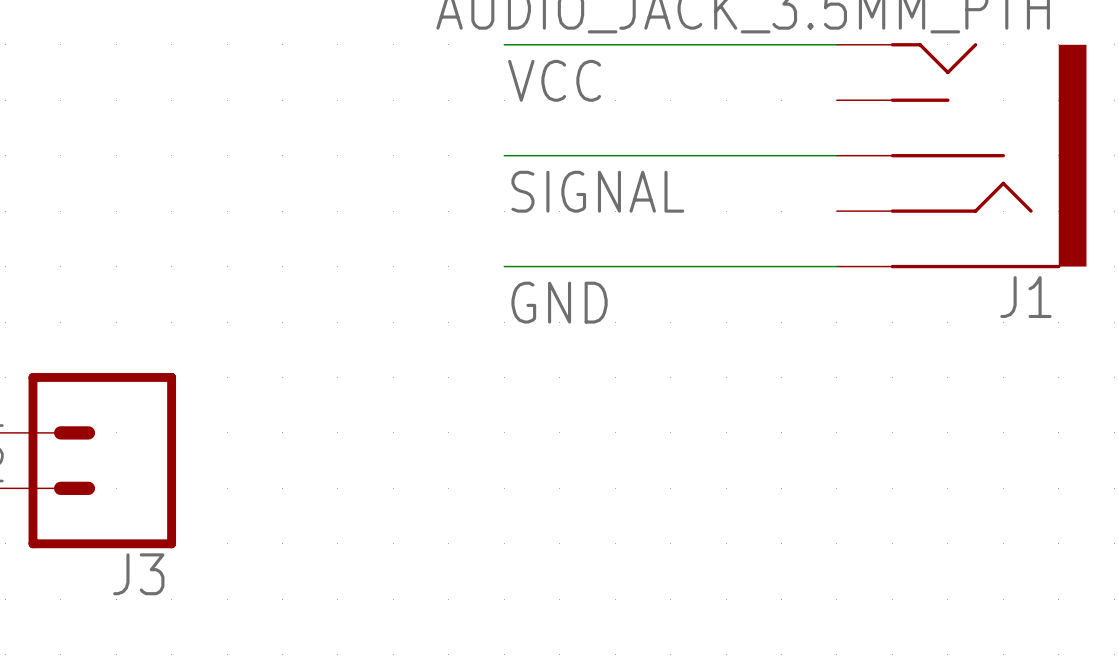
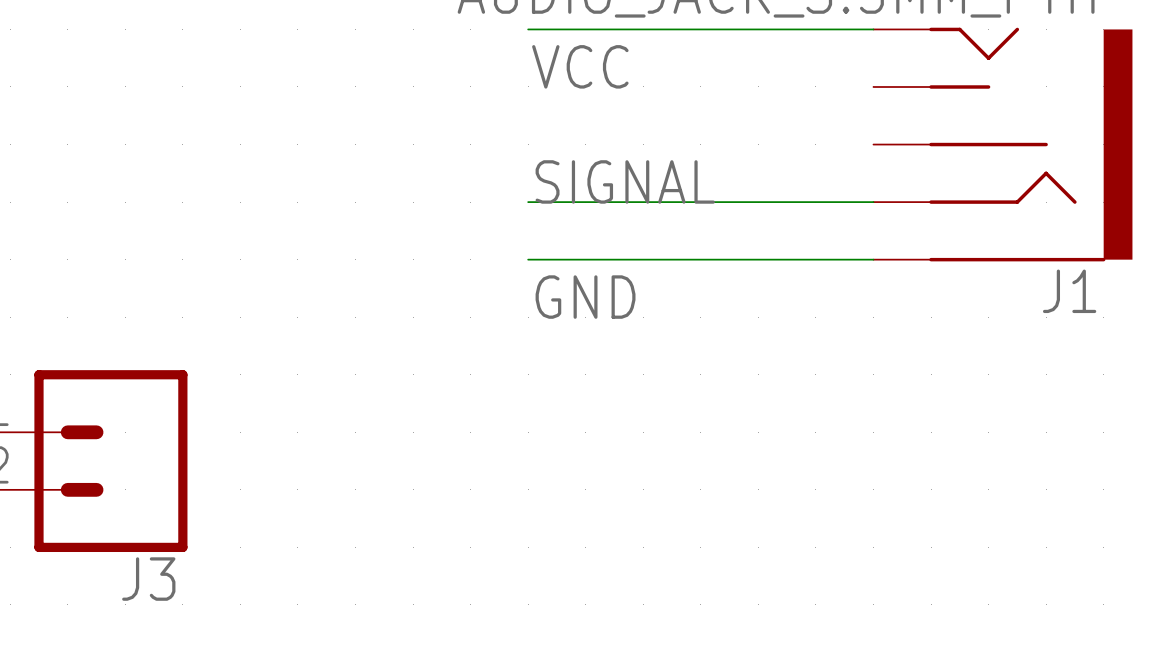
wire: (504, 155) (836, 155) -> (528, 202) (873, 202)

